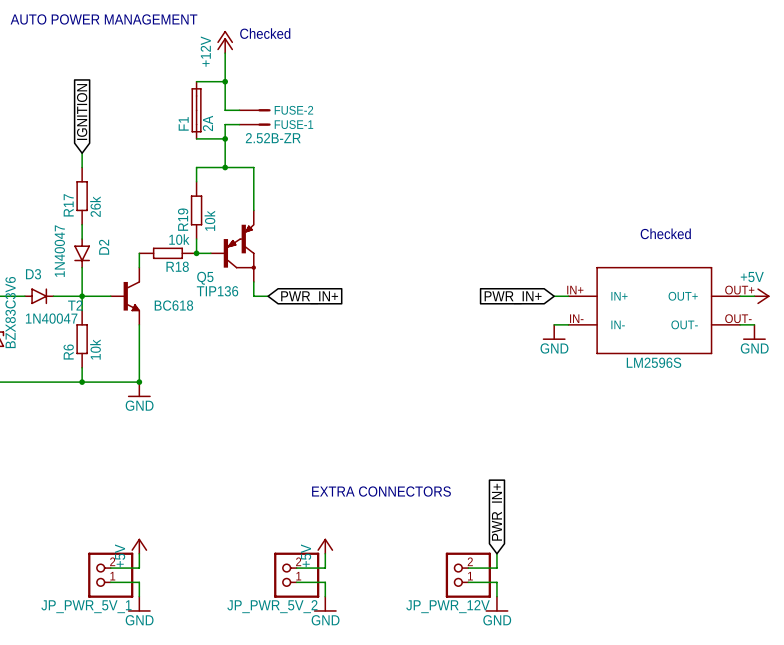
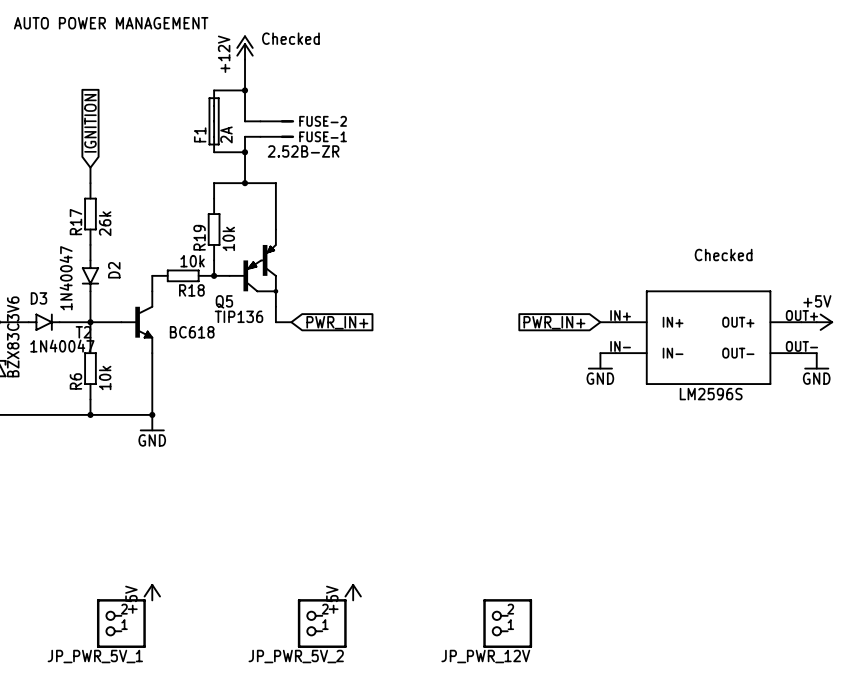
text: EXTRA CONNECTORS (381, 491) -> none
global label: PWR_IN+ (498, 512) -> none
wire: (139, 553) (139, 568) (110, 568) -> none
wire: (325, 553) (325, 568) (296, 568) -> none
wire: (496, 553) (496, 568) (468, 568) -> none
wire: (110, 582) (139, 582) (139, 596) -> none
wire: (296, 582) (325, 582) (325, 596) -> none
wire: (468, 582) (496, 582) (496, 596) -> none
power symbol: GND (139, 604) -> none
power symbol: GND (325, 604) -> none
power symbol: GND (496, 604) -> none

